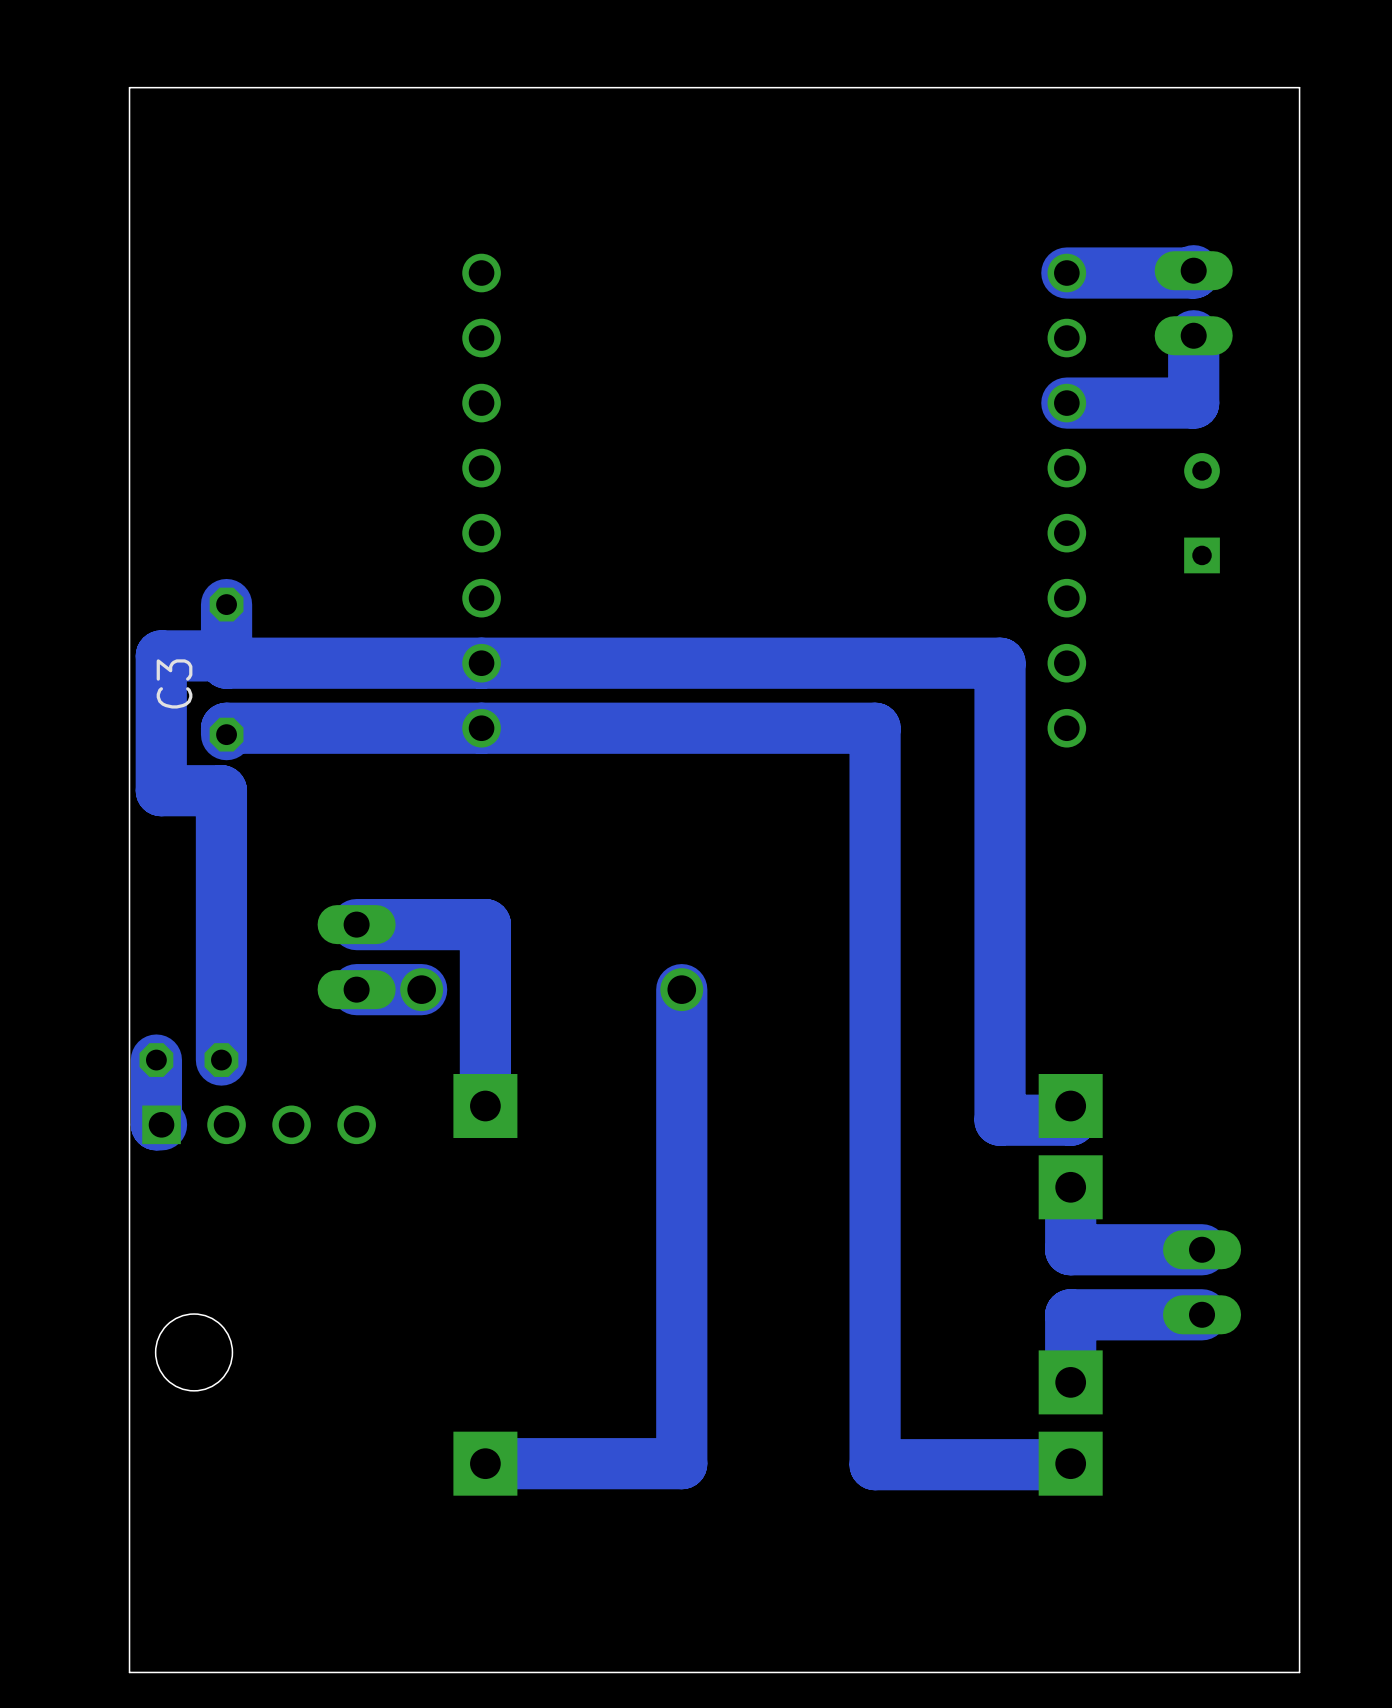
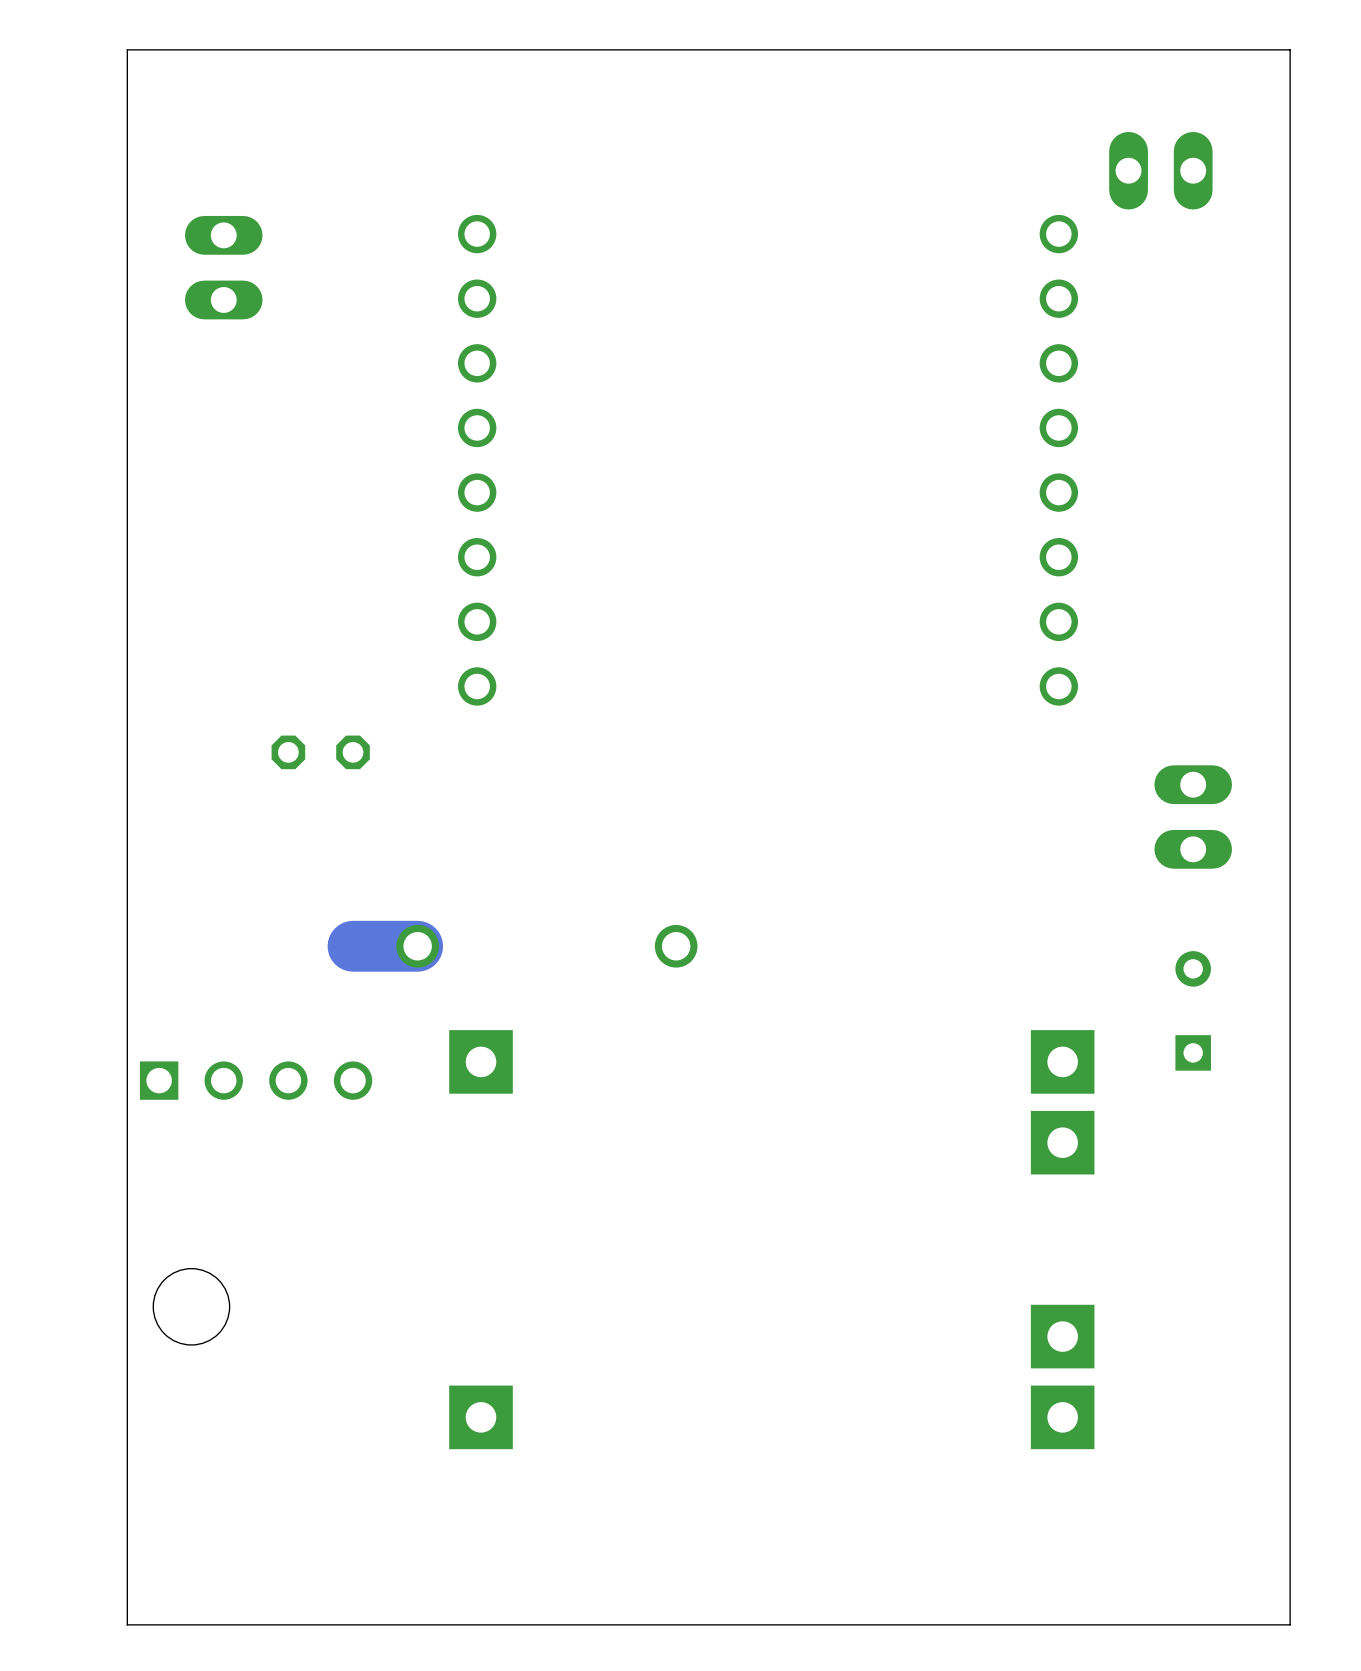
track: (1193, 270) (1193, 273) (1066, 273) -> none
part rotation: 0° (1193, 303) -> 90° clockwise (1160, 170)
part position: (1193, 303) -> (1160, 170)
part: none -> (223, 267)
track: (1193, 335) (1193, 403) (1066, 403) -> none
part position: (1202, 513) -> (1193, 1010)
track: (226, 604) (226, 663) (1000, 663) (1000, 1120) (1070, 1120) (1070, 1106) -> none
track: (206, 655) (161, 655) (161, 790) (221, 790) (221, 1060) -> none
C3: (226, 669) -> none
track: (226, 734) (226, 728) (875, 728) (875, 1464) (1070, 1463) -> none
part: none -> (1193, 817)
track: (356, 924) (485, 924) (485, 1106) -> none
part: (356, 957) -> none
track: (681, 989) (681, 1463) (485, 1463) -> none
track: (156, 1060) (156, 1124) (161, 1124) -> none
part position: (188, 1060) -> (320, 752)
track: (1070, 1187) (1070, 1249) (1202, 1249) -> none
part: (1202, 1282) -> none
track: (1202, 1314) (1070, 1314) (1070, 1382) -> none

